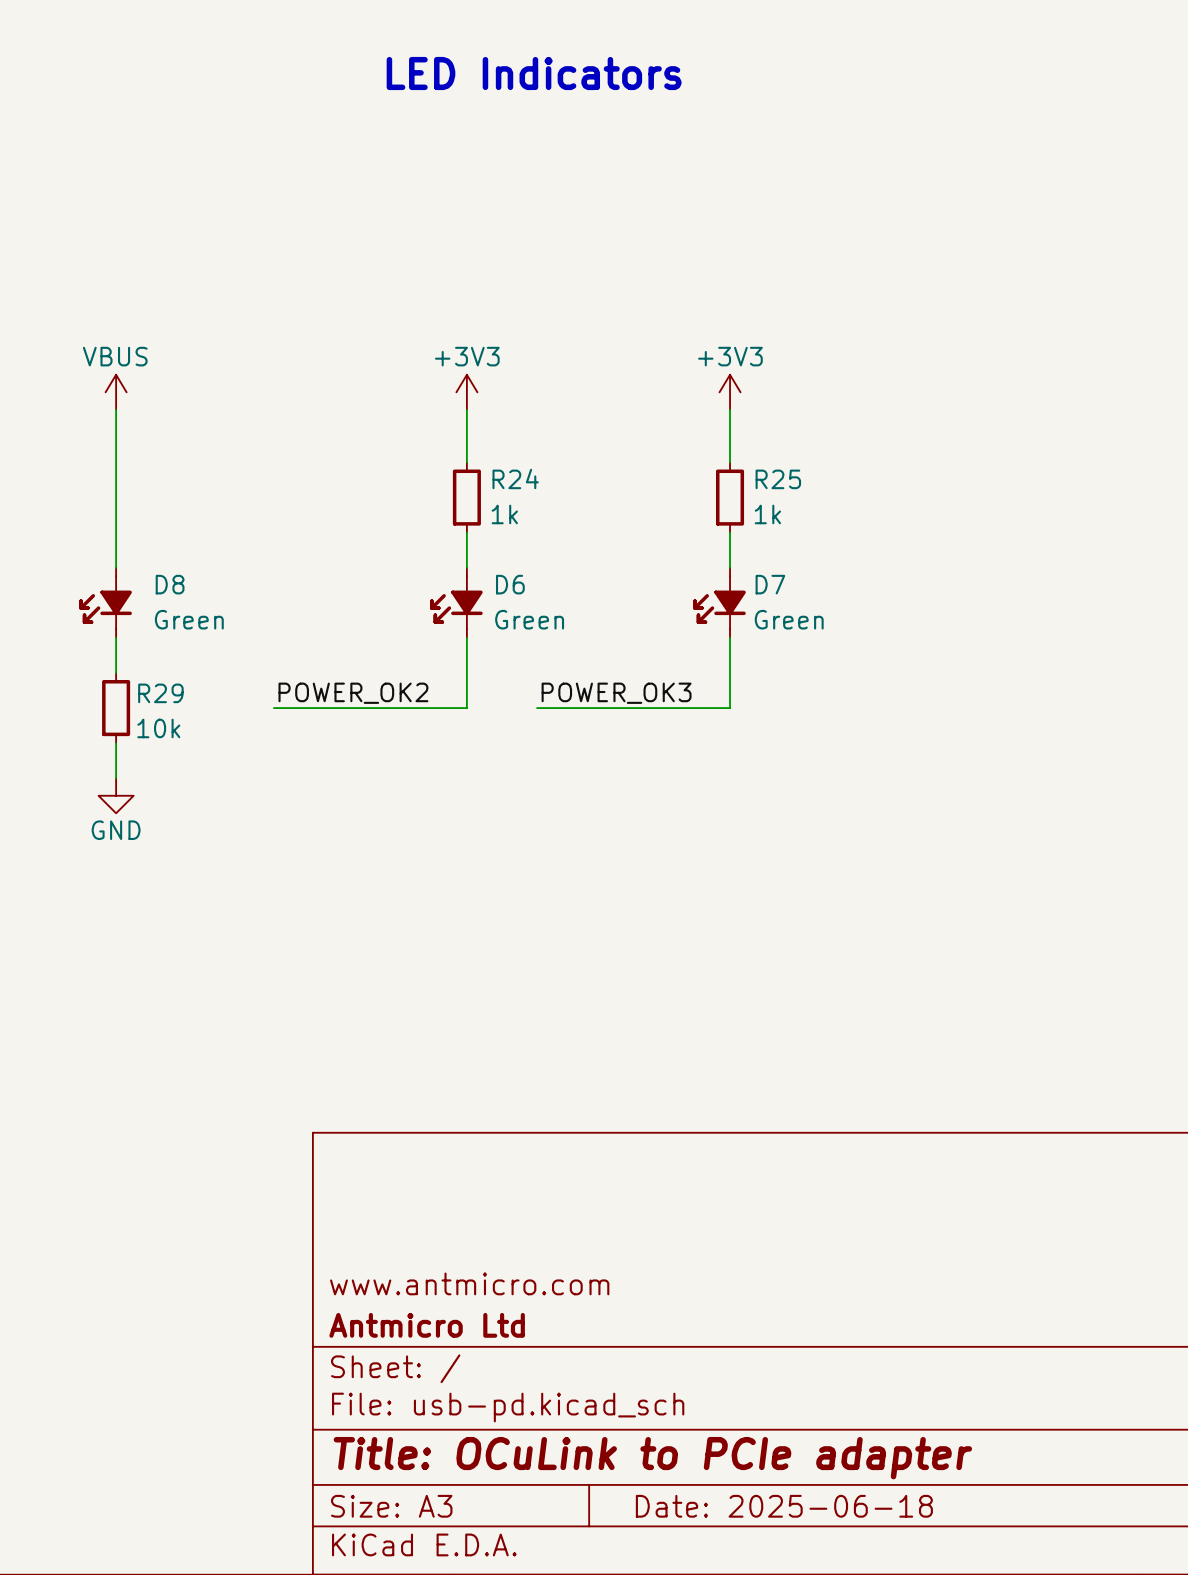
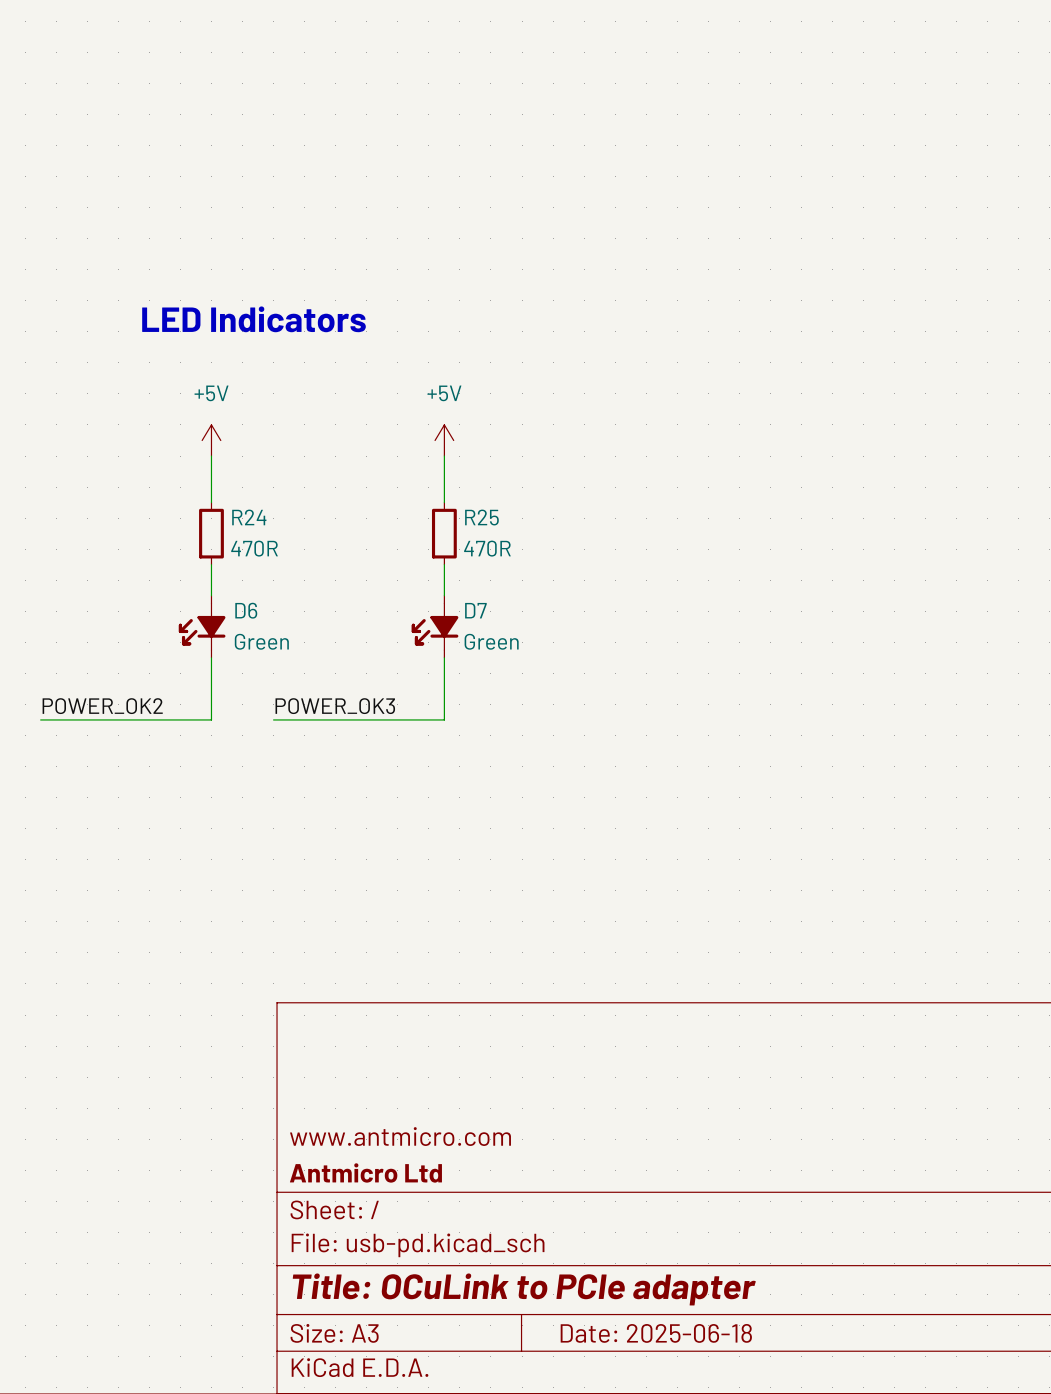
text: LED Indicators (534, 73) -> none
text: none -> LED Indicators (254, 319)
power symbol: VBUS (116, 392) -> none
power symbol: +3V3 (466, 392) -> none
power symbol: +3V3 (730, 392) -> none
wire: (116, 409) (116, 567) -> none
wire: (466, 409) (466, 462) -> (211, 456) (211, 502)
wire: (730, 409) (730, 462) -> (444, 456) (444, 502)
power symbol: none -> +5V (211, 440)
R24 position: (466, 497) -> (211, 533)
power symbol: none -> +5V (444, 440)
R25 position: (730, 497) -> (444, 533)
R24 text: 1k (504, 514) -> 470R (254, 548)
R25 text: 1k (767, 514) -> 470R (487, 548)
wire: (466, 532) (466, 567) -> (211, 564) (211, 595)
wire: (730, 532) (730, 567) -> (444, 564) (444, 595)
D8: (105, 602) -> none
D6 position: (456, 602) -> (202, 626)
D7 position: (719, 602) -> (435, 626)
wire: (116, 637) (116, 672) -> none
wire: (466, 637) (466, 708) (273, 708) -> (211, 657) (211, 719) (40, 719)
wire: (730, 637) (730, 708) (537, 708) -> (444, 657) (444, 719) (273, 719)
label position: POWER_OK2 (353, 693) -> POWER_OK2 (102, 706)
label position: POWER_OK3 (616, 693) -> POWER_OK3 (335, 706)
R29: (116, 708) -> none
wire: (116, 743) (116, 778) -> none
power symbol: GND (116, 795) -> none

